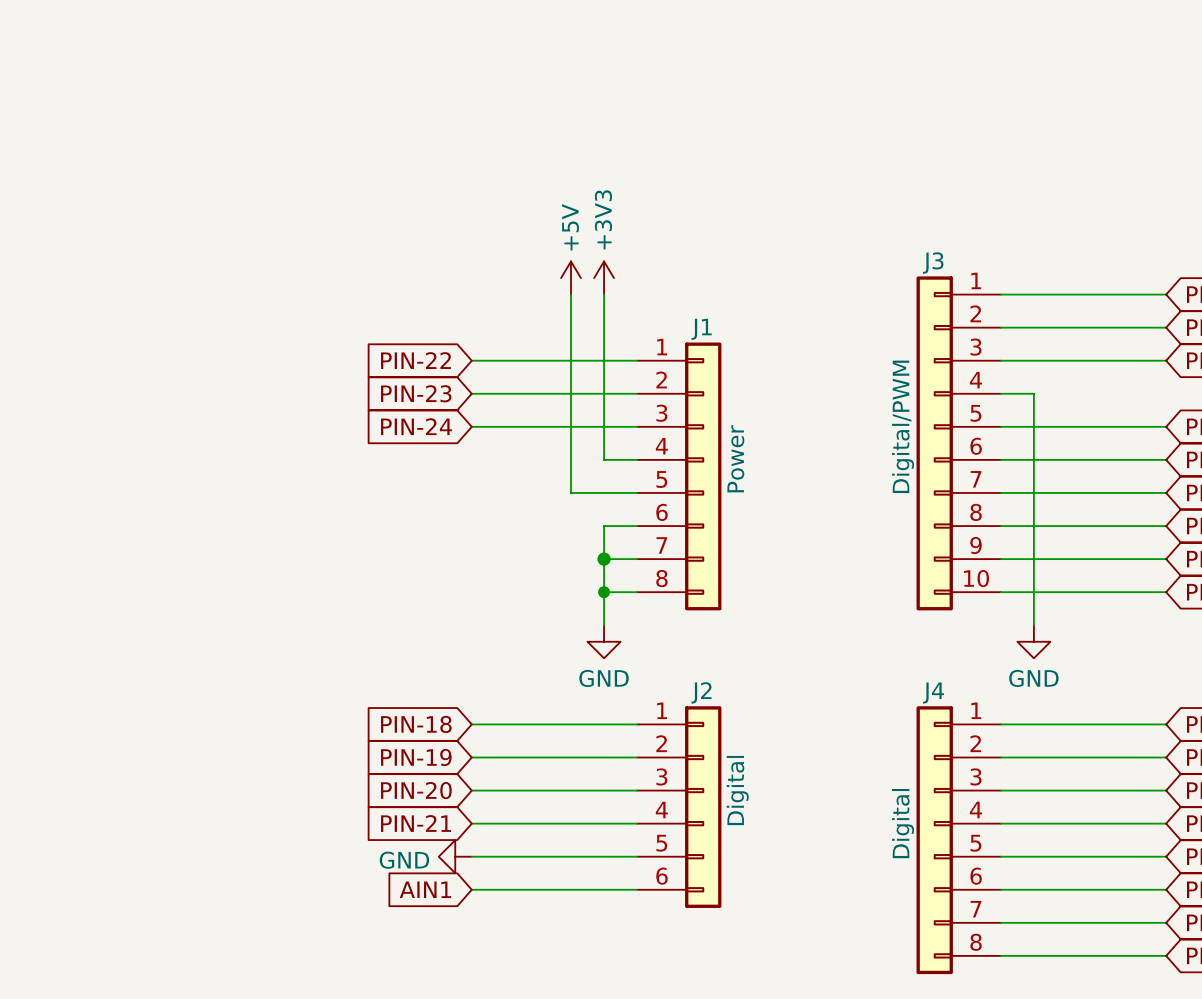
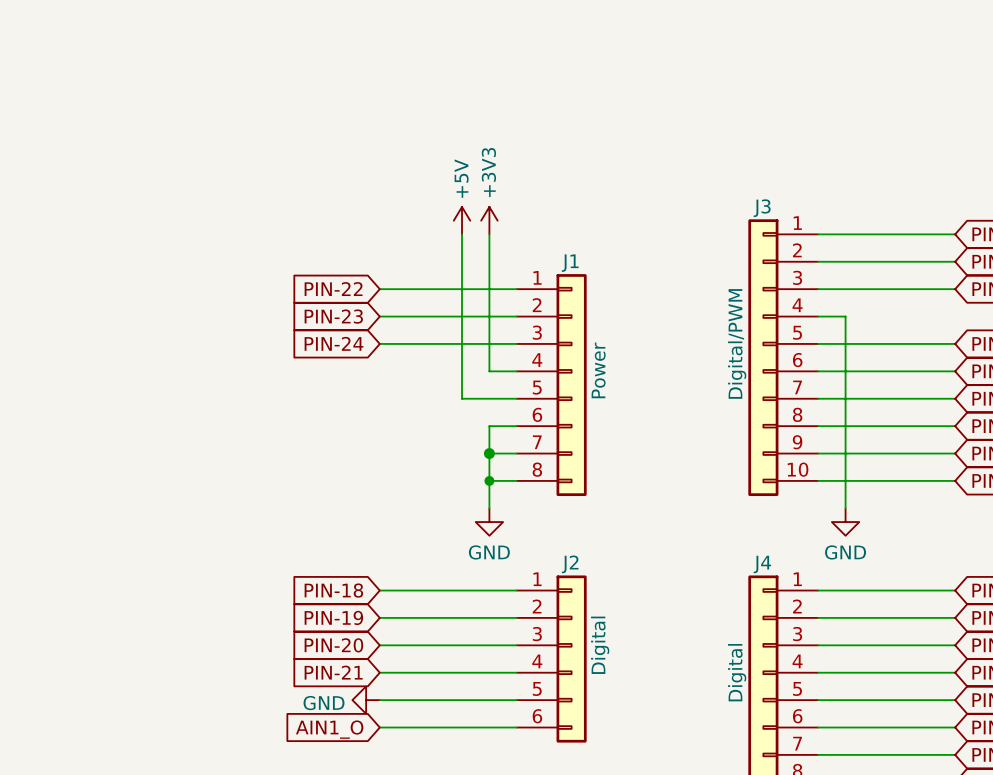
global label: AIN1 (425, 889) -> AIN1_O (329, 729)

